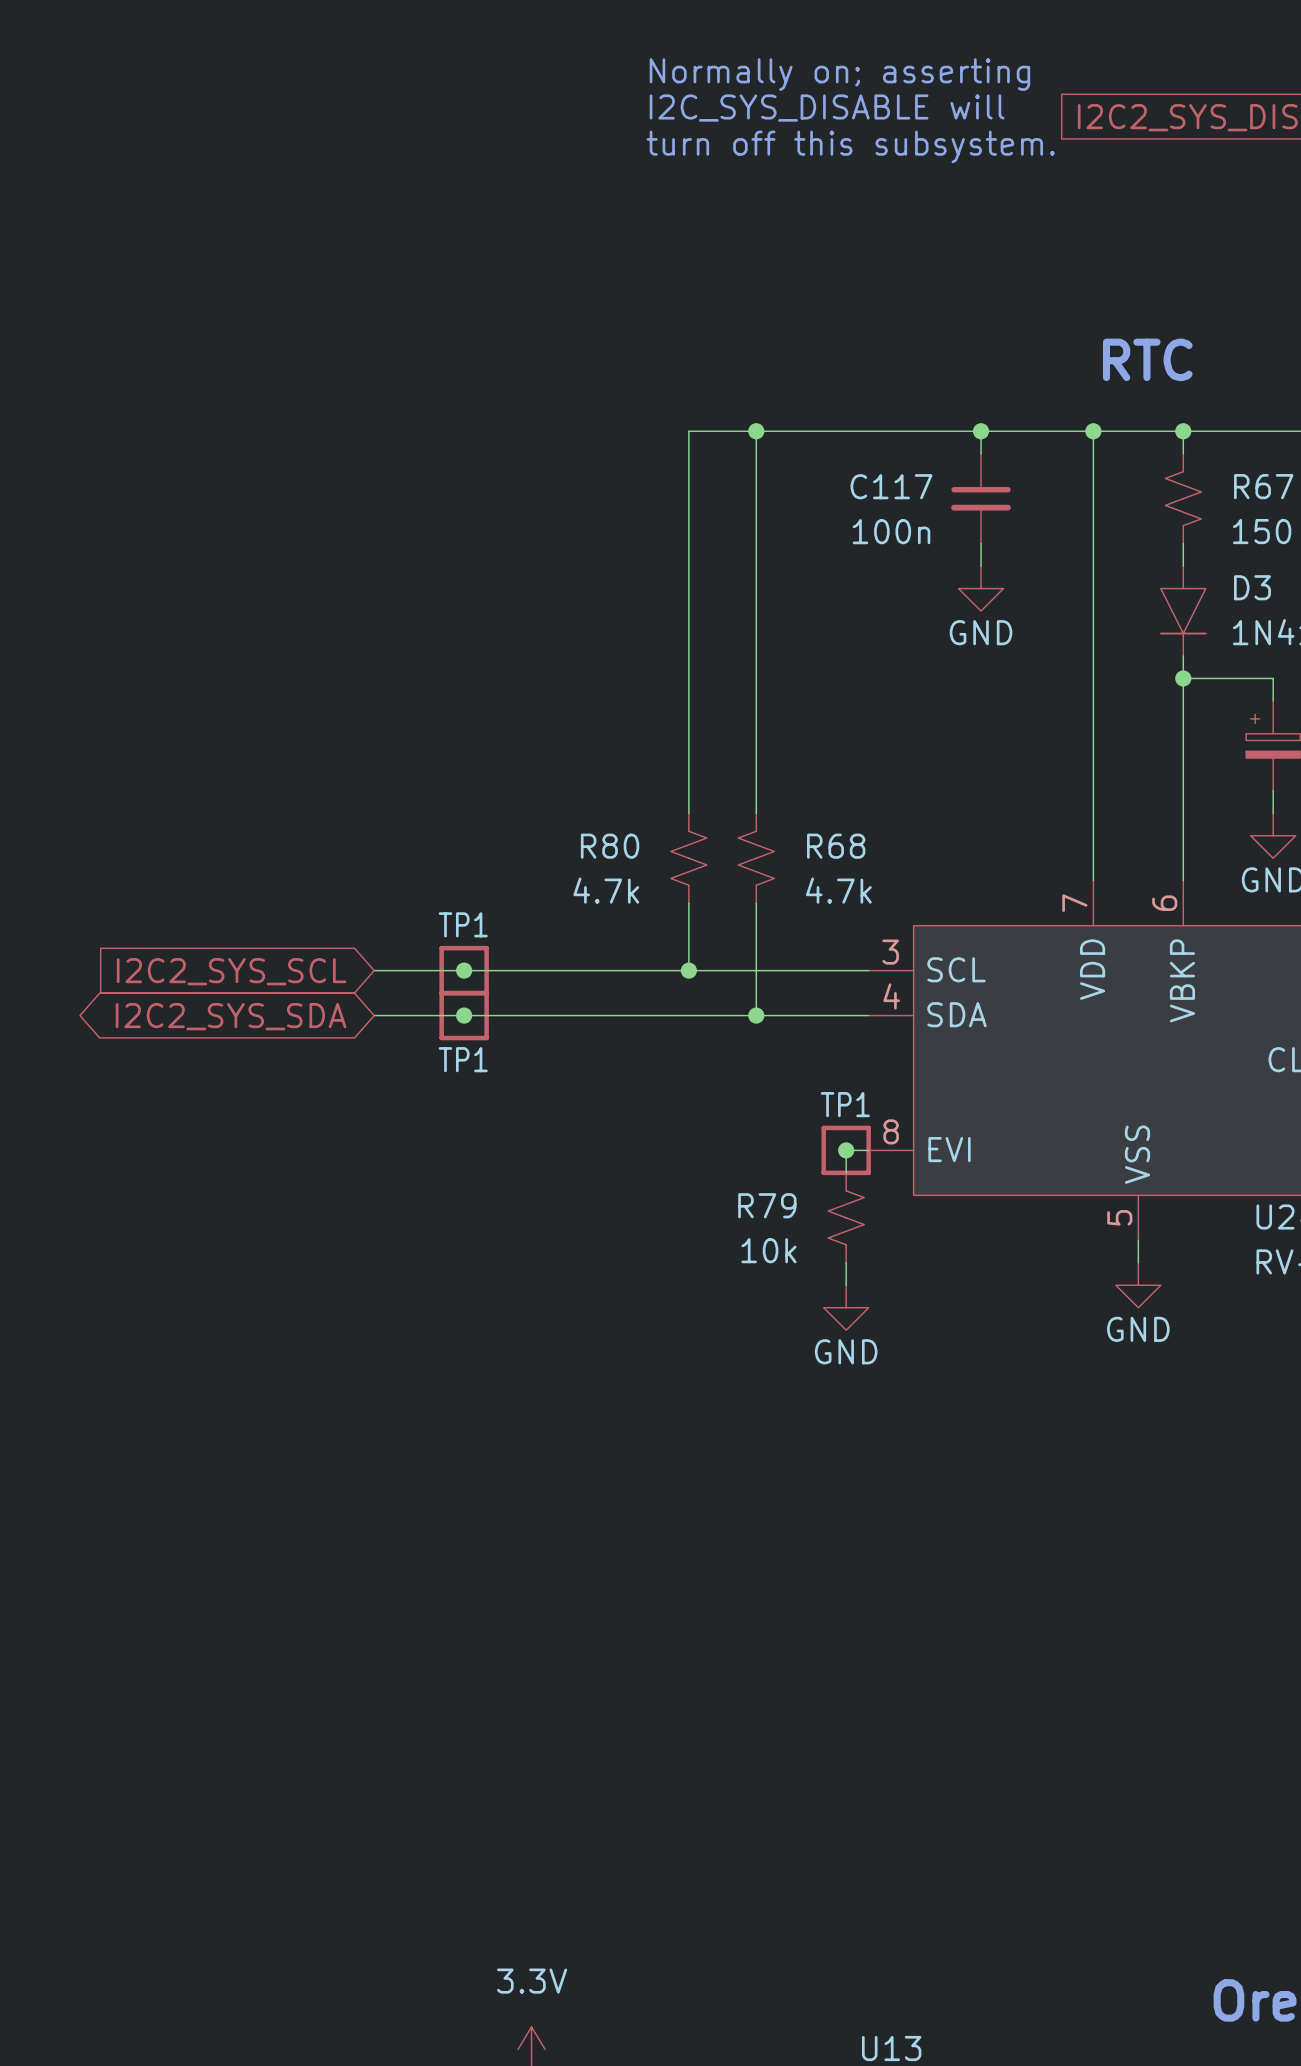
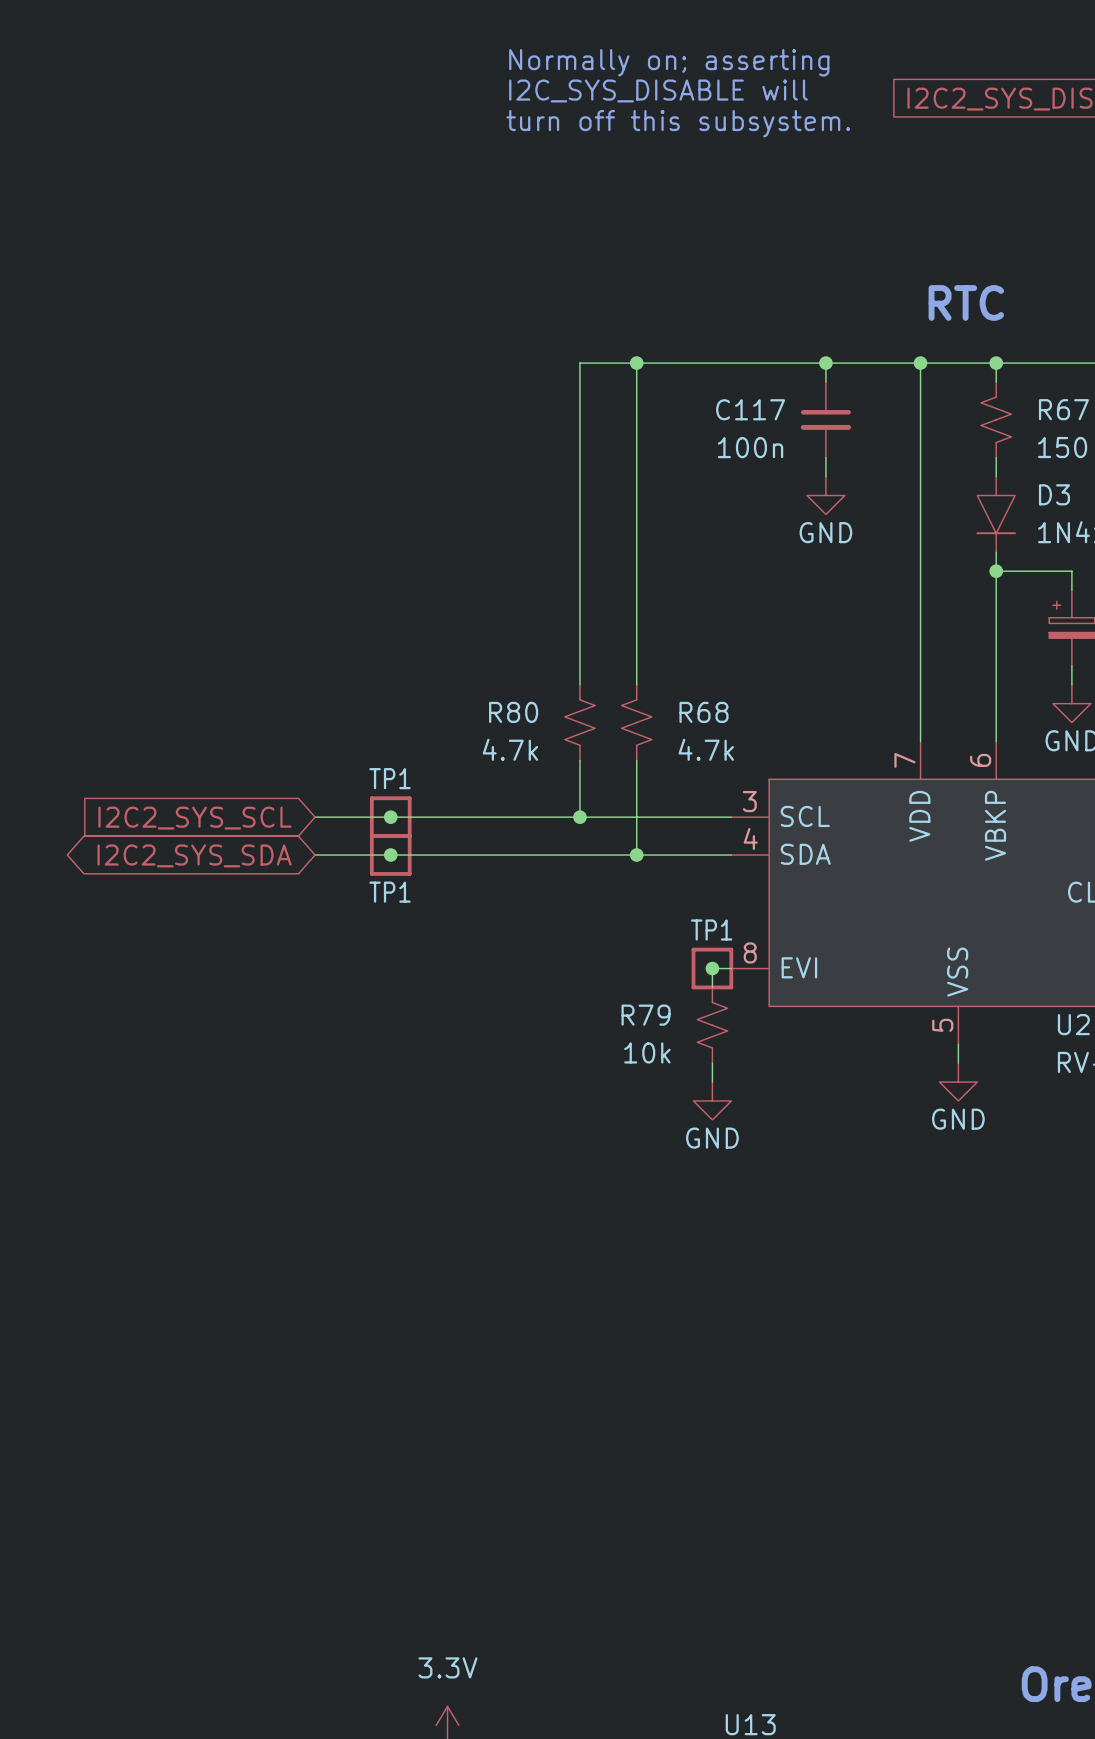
text position: Normally on; asserting (839, 74) -> Normally on; asserting (669, 62)
text position: I2C_SYS_DISABLE will (827, 108) -> I2C_SYS_DISABLE will (658, 90)
text position: turn off this subsystem. (850, 146) -> turn off this subsystem. (678, 123)

